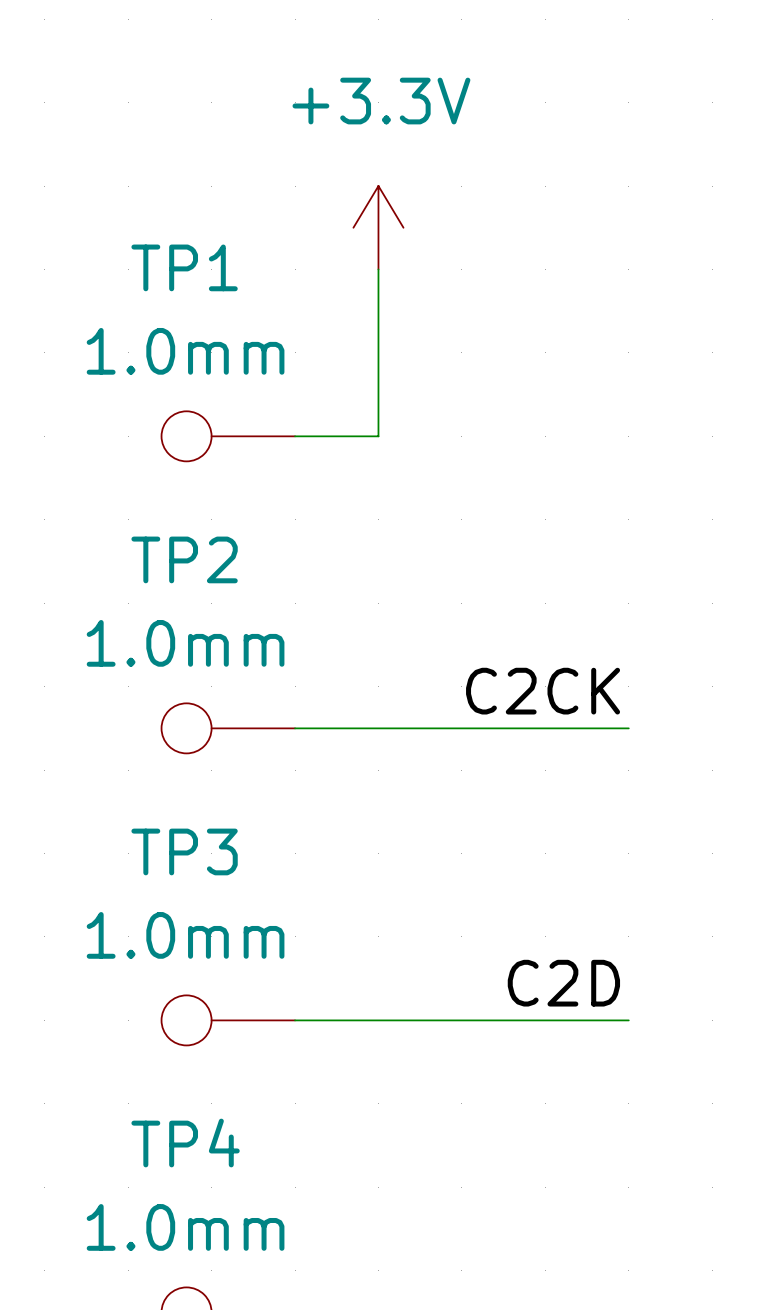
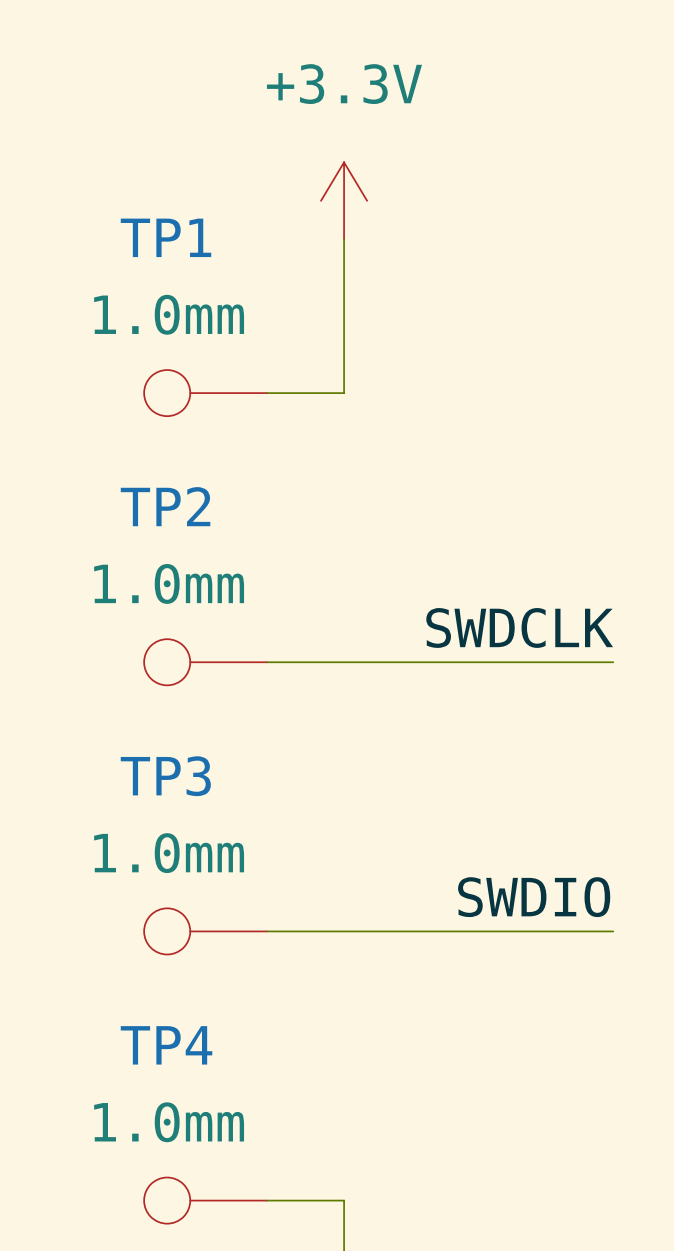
label: C2CK (543, 691) -> none
label: none -> SWDCLK (519, 627)
wire: none -> (574, 662) (613, 662)
label: C2D (563, 983) -> none
label: none -> SWDIO (534, 897)
wire: none -> (574, 931) (613, 931)

